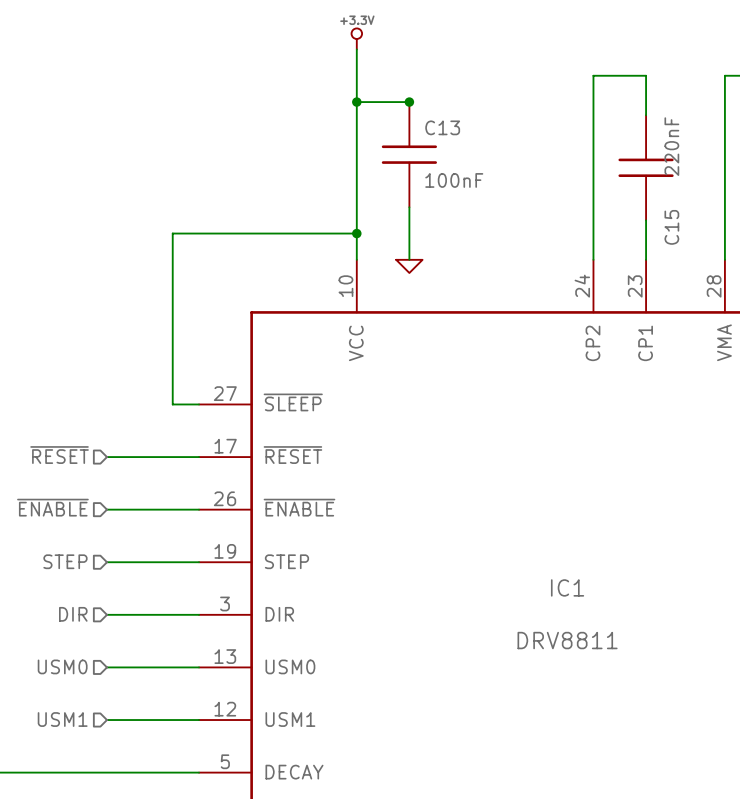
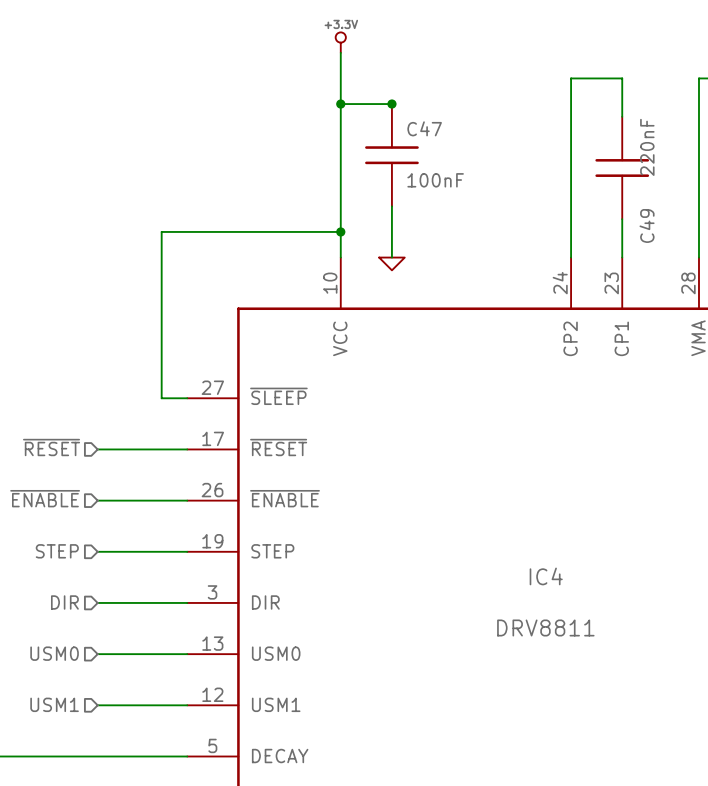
C13 name: C13 (442, 127) -> C47 (424, 128)
C15 name: C15 (671, 227) -> C49 (647, 225)
IC1 name: IC1 (567, 587) -> IC4 (546, 576)

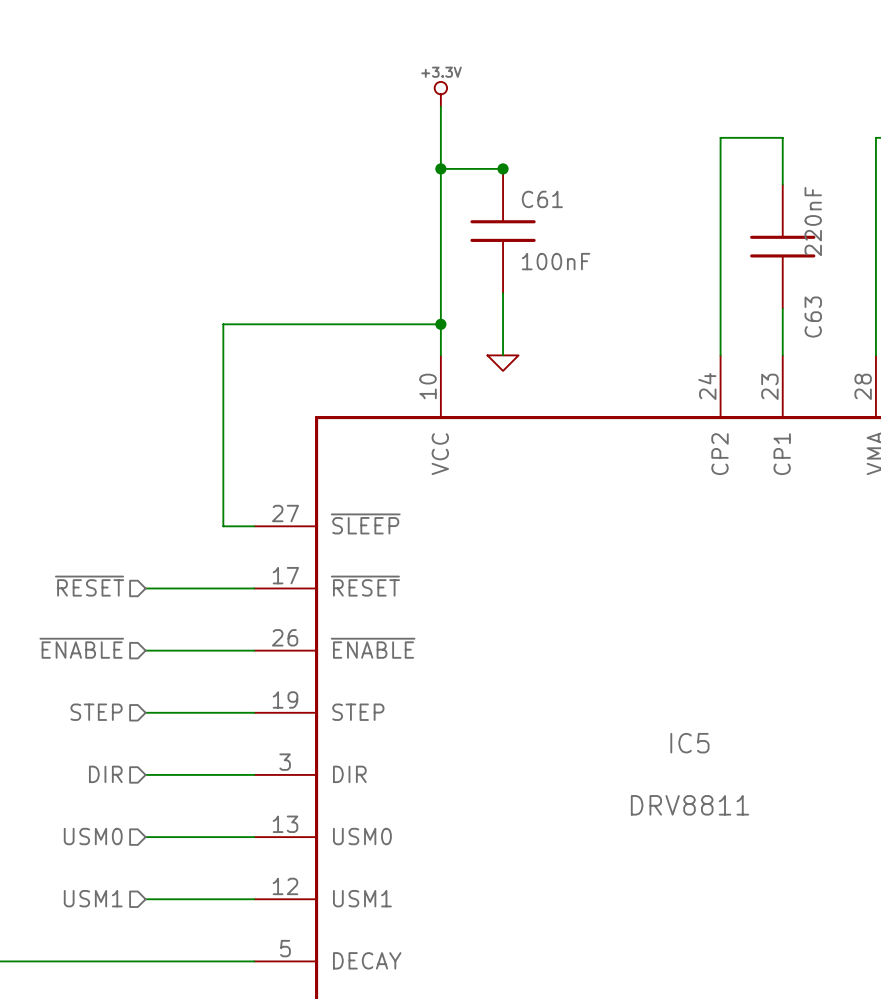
C47 name: C47 (424, 128) -> C61 (542, 199)
C49 name: C49 (647, 225) -> C63 (813, 317)
IC4 name: IC4 (546, 576) -> IC5 (689, 743)

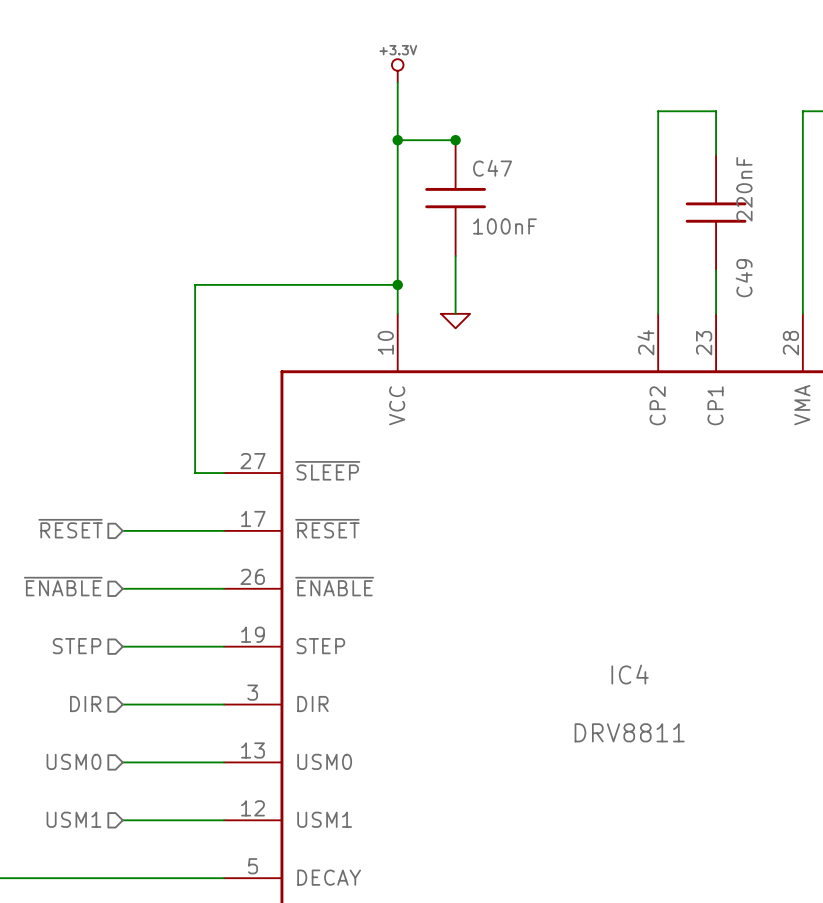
C61 name: C61 (542, 199) -> C47 (492, 168)
C63 name: C63 (813, 317) -> C49 (744, 278)
IC5 name: IC5 (689, 743) -> IC4 (630, 674)

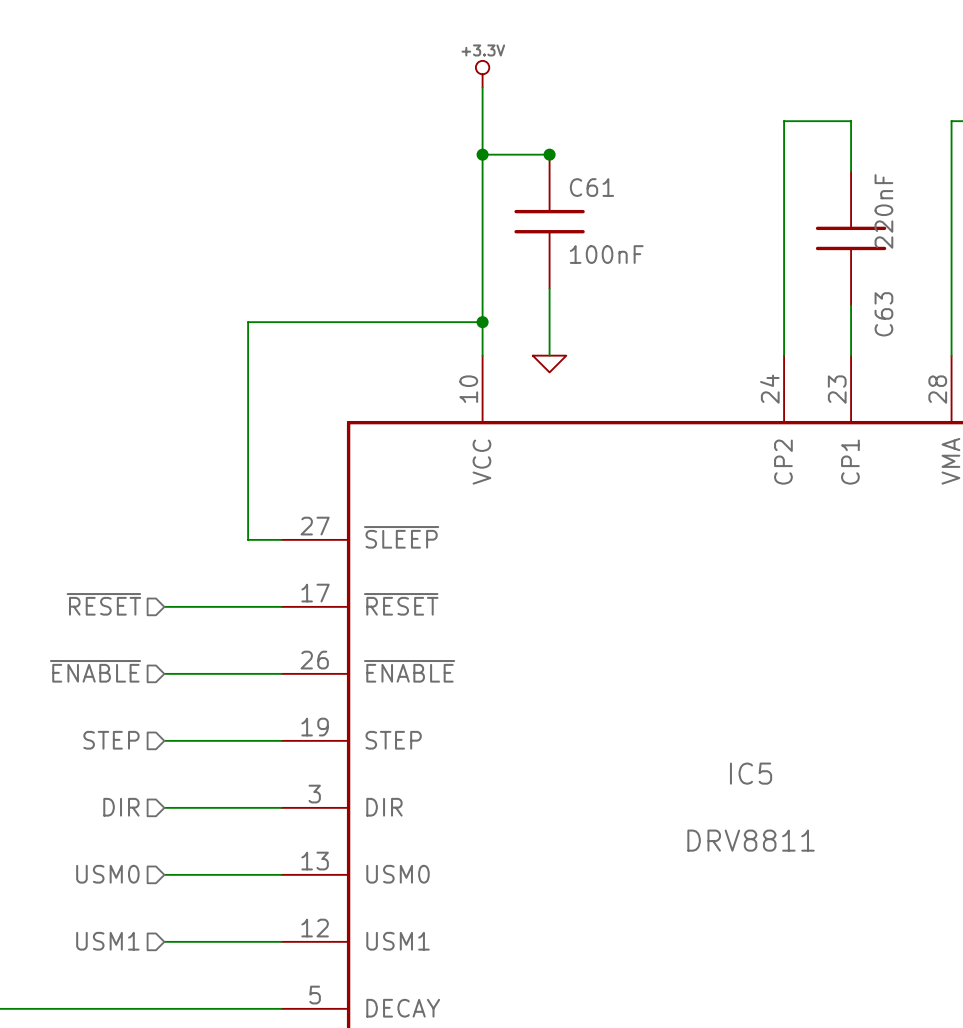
C47 name: C47 (492, 168) -> C61 (591, 187)
C49 name: C49 (744, 278) -> C63 (883, 314)
IC4 name: IC4 (630, 674) -> IC5 (751, 773)

